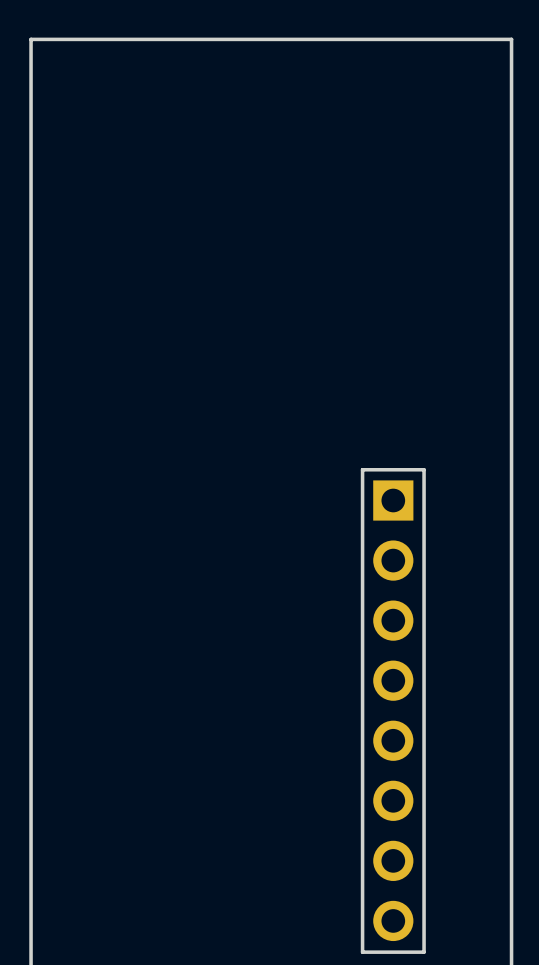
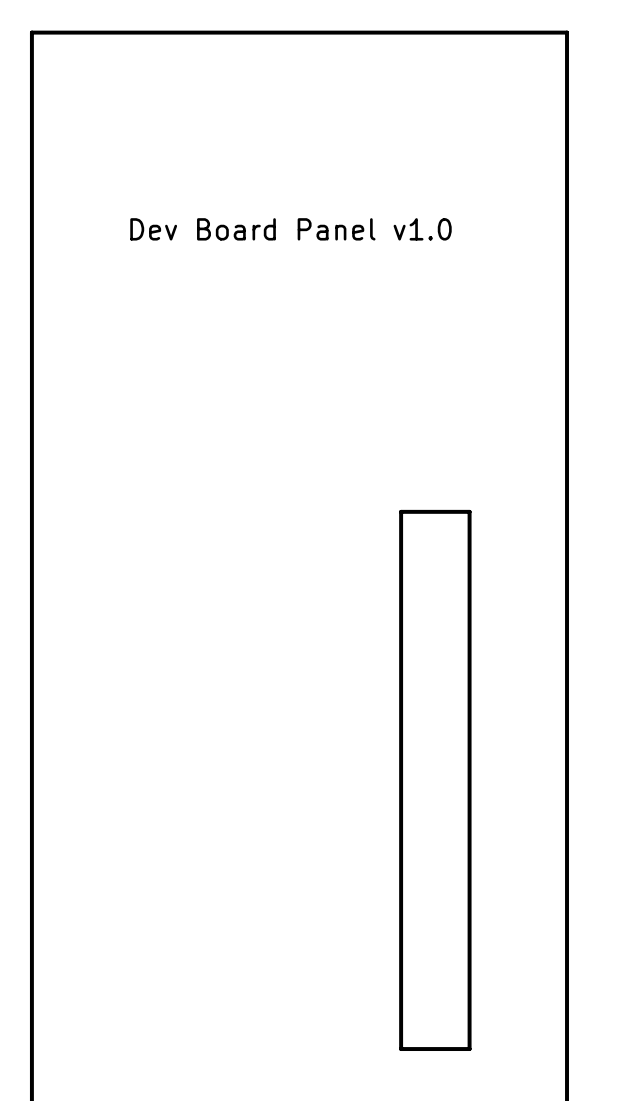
text: none -> Dev Board Panel v1.0 (290, 229)
part: (393, 710) -> none

